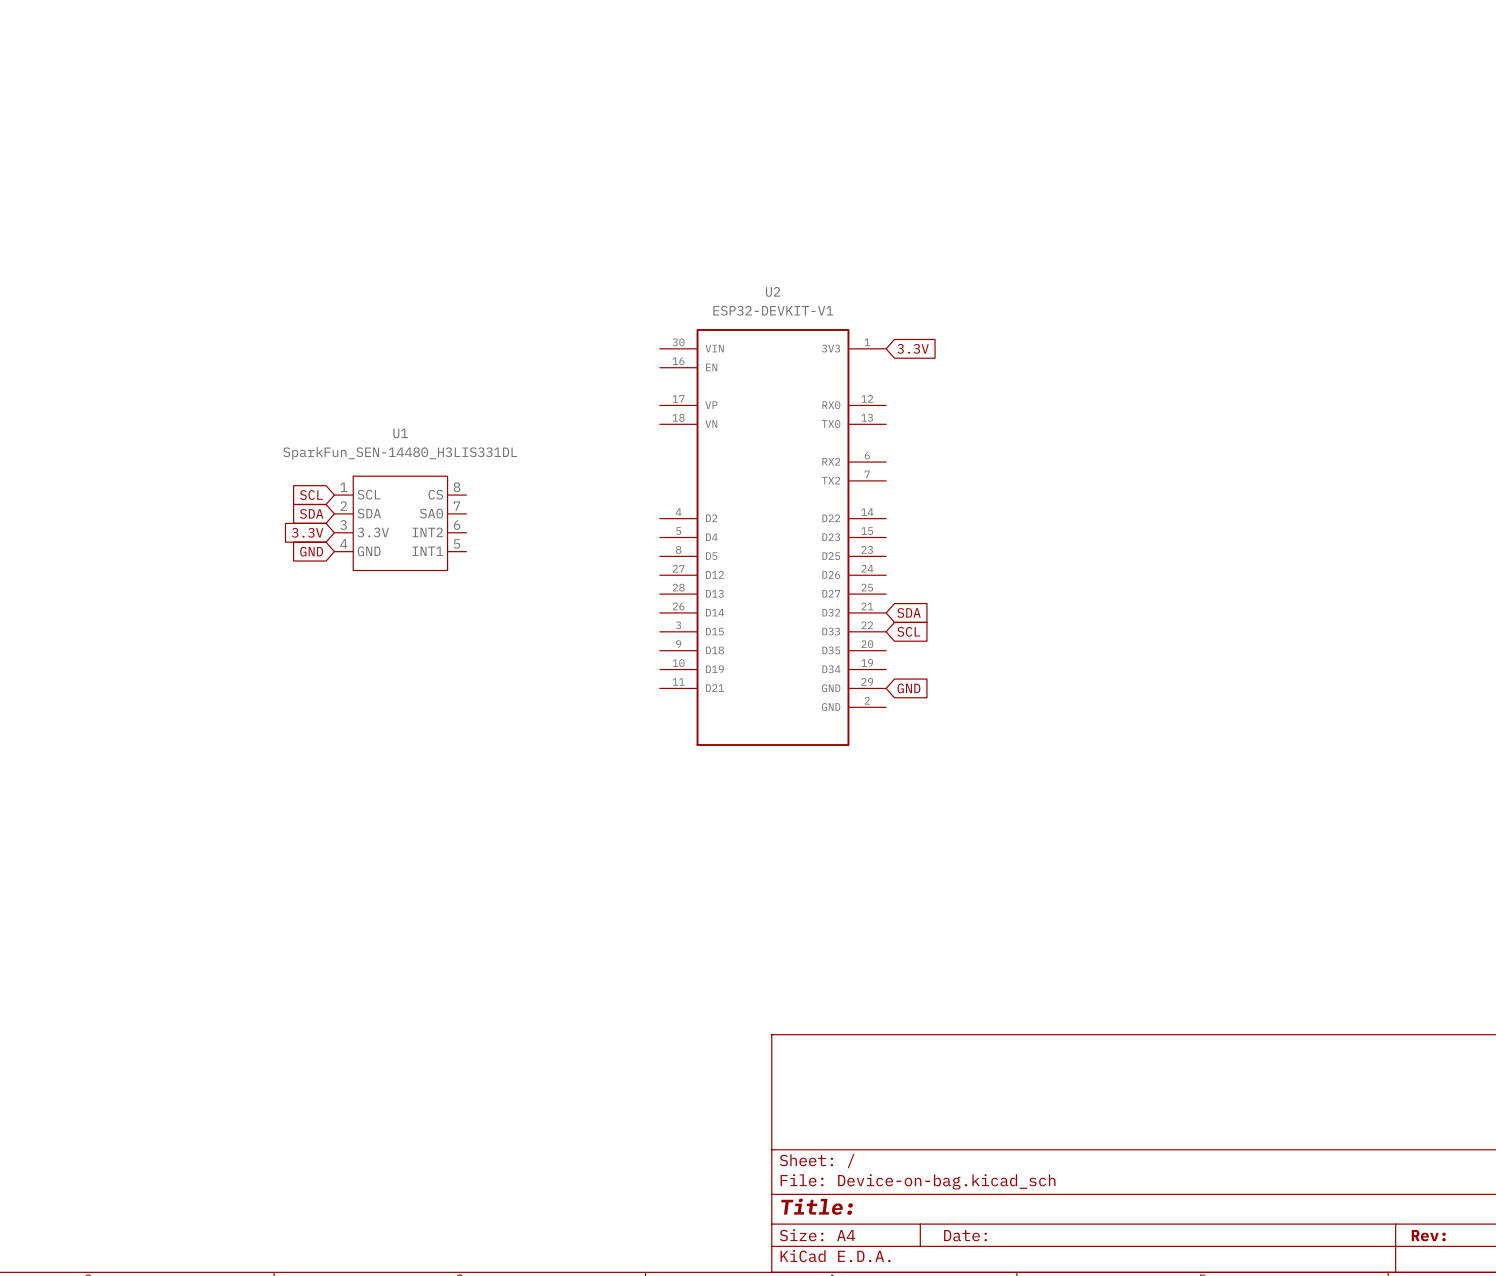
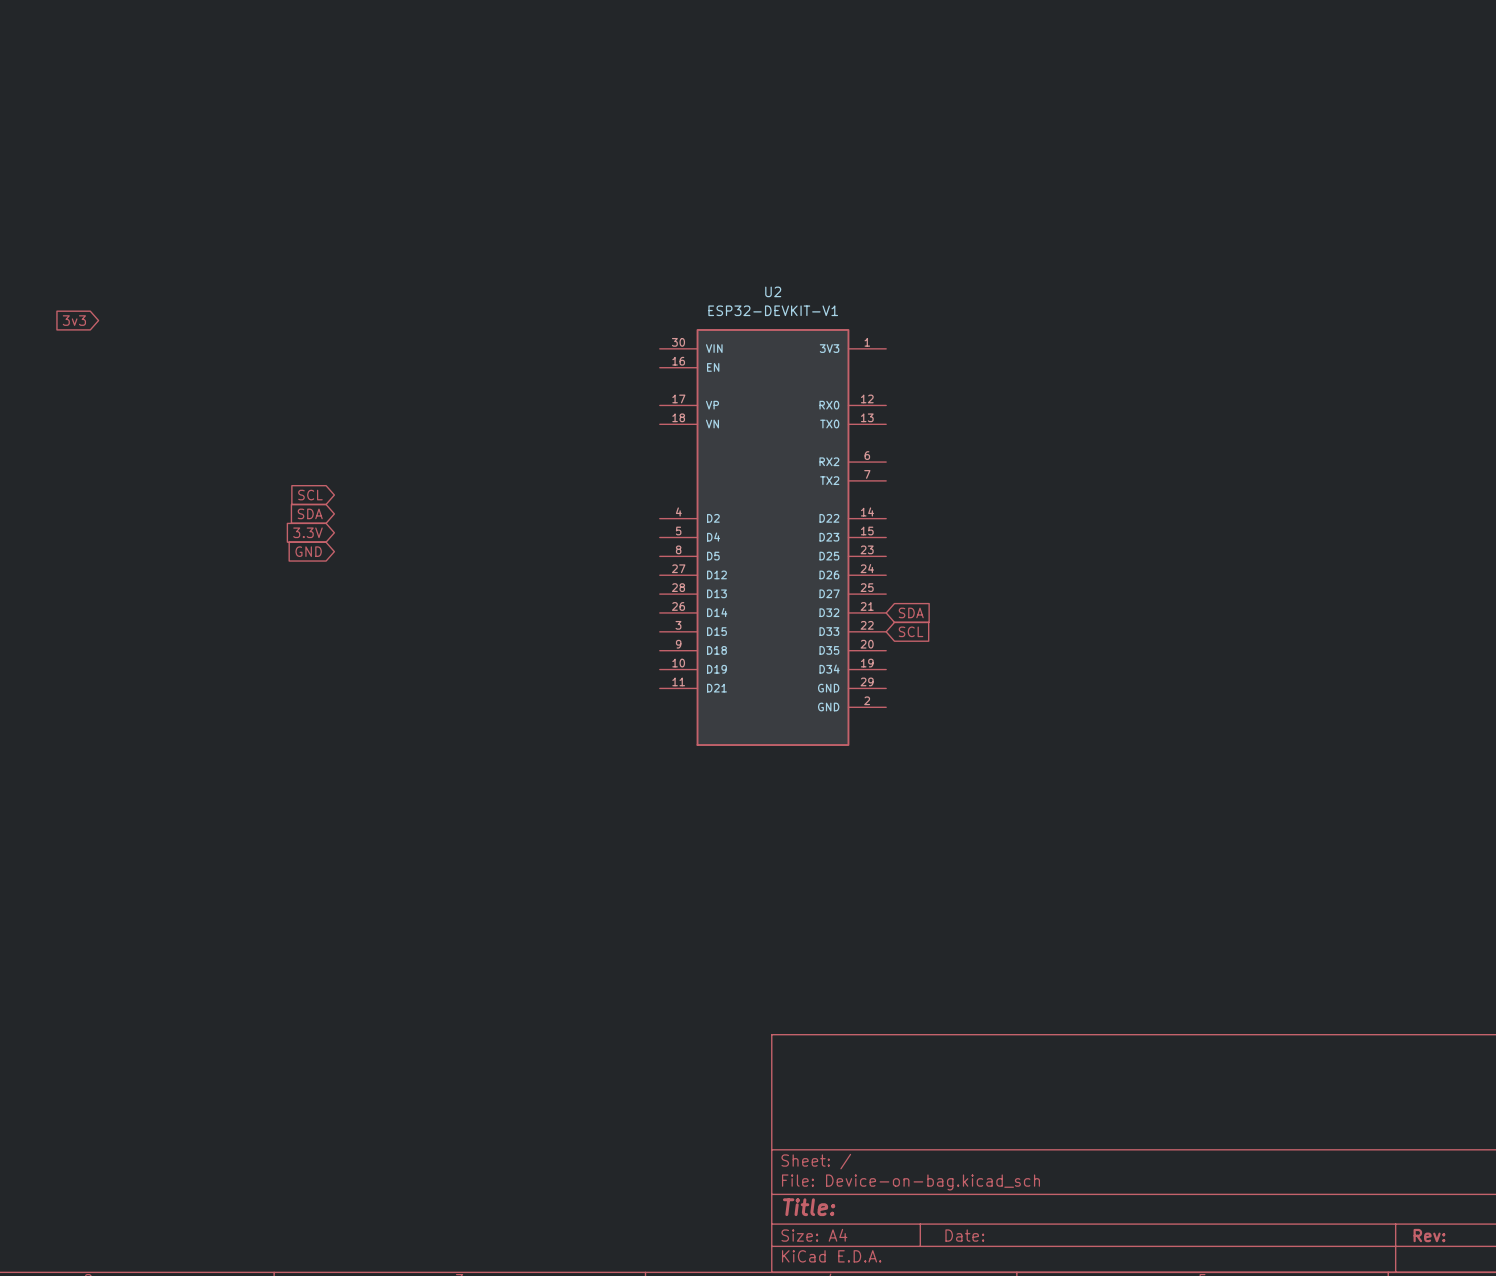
global label: none -> 3v3 (74, 320)
global label: 3.3V (913, 348) -> none
U1: SparkFun_SEN-14480_H3LIS331DL (400, 523) -> none
global label: GND (908, 688) -> none

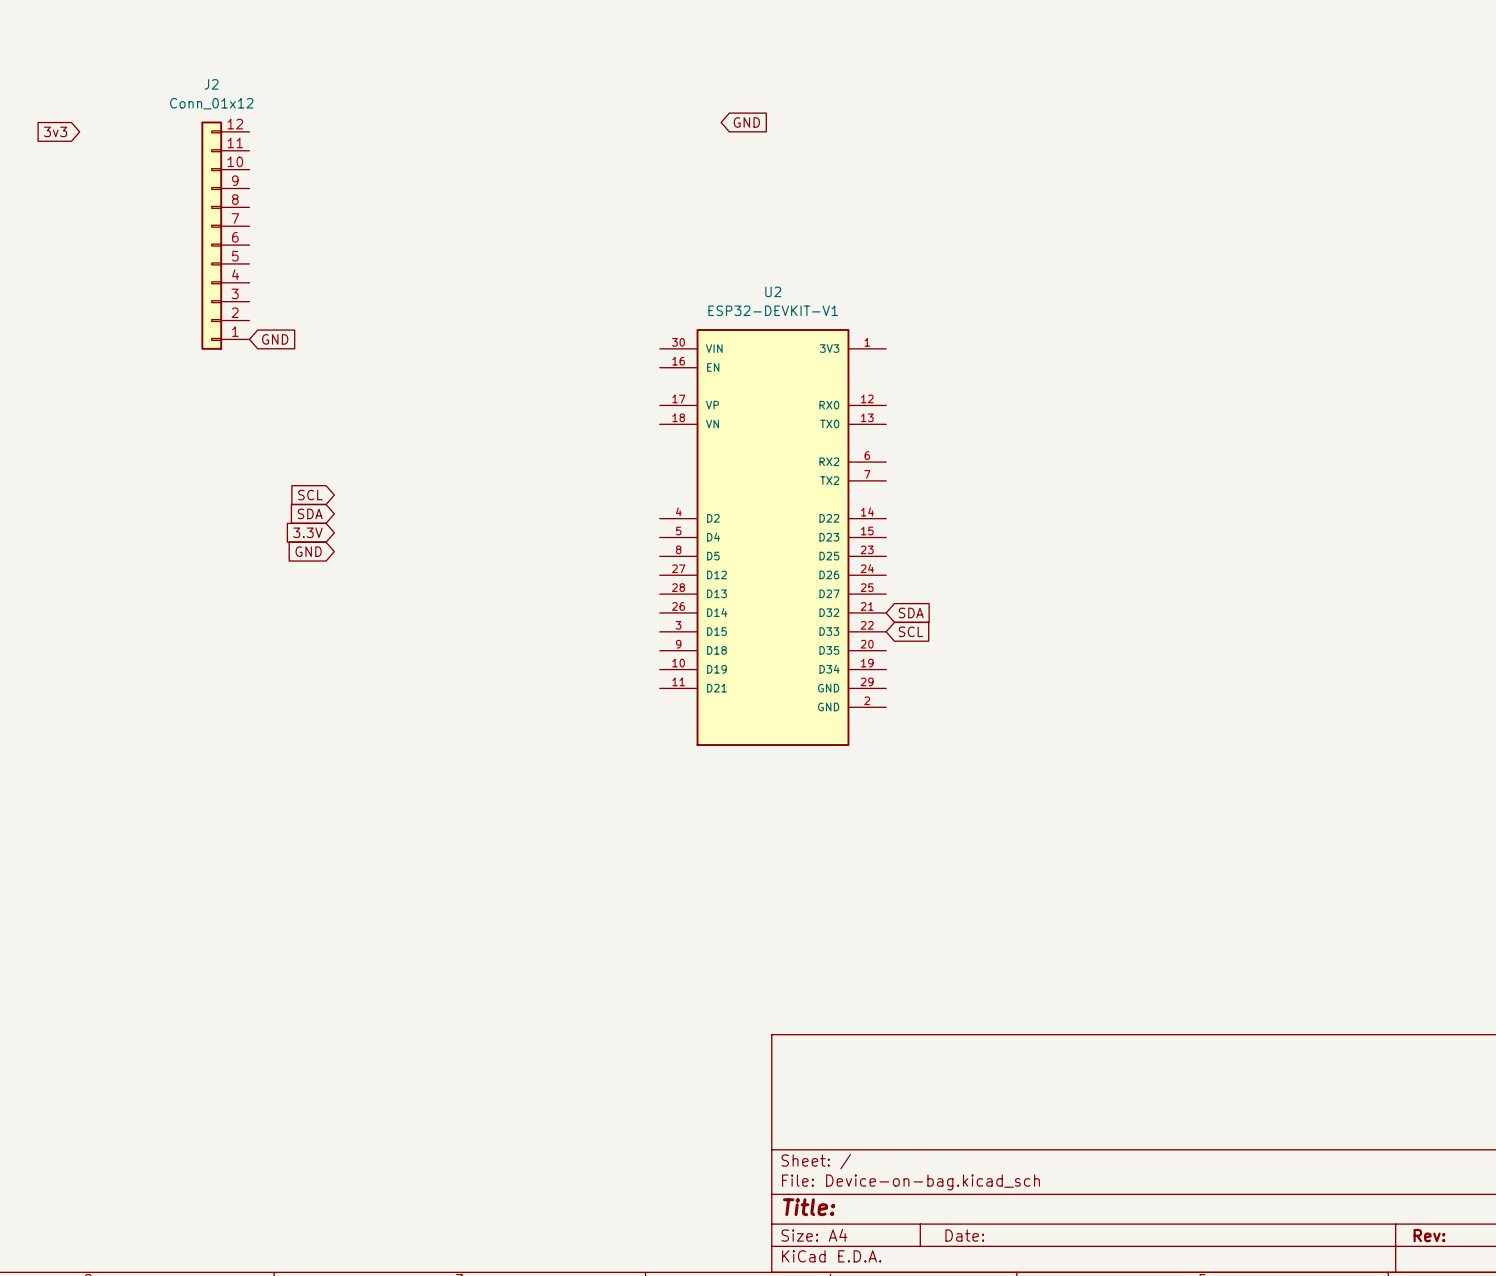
global label: none -> GND (746, 122)
global label: none -> 3v3 (55, 131)
J2: none -> Conn_01x12 (225, 235)
global label: 3v3 (74, 320) -> none
global label: none -> GND (275, 339)

